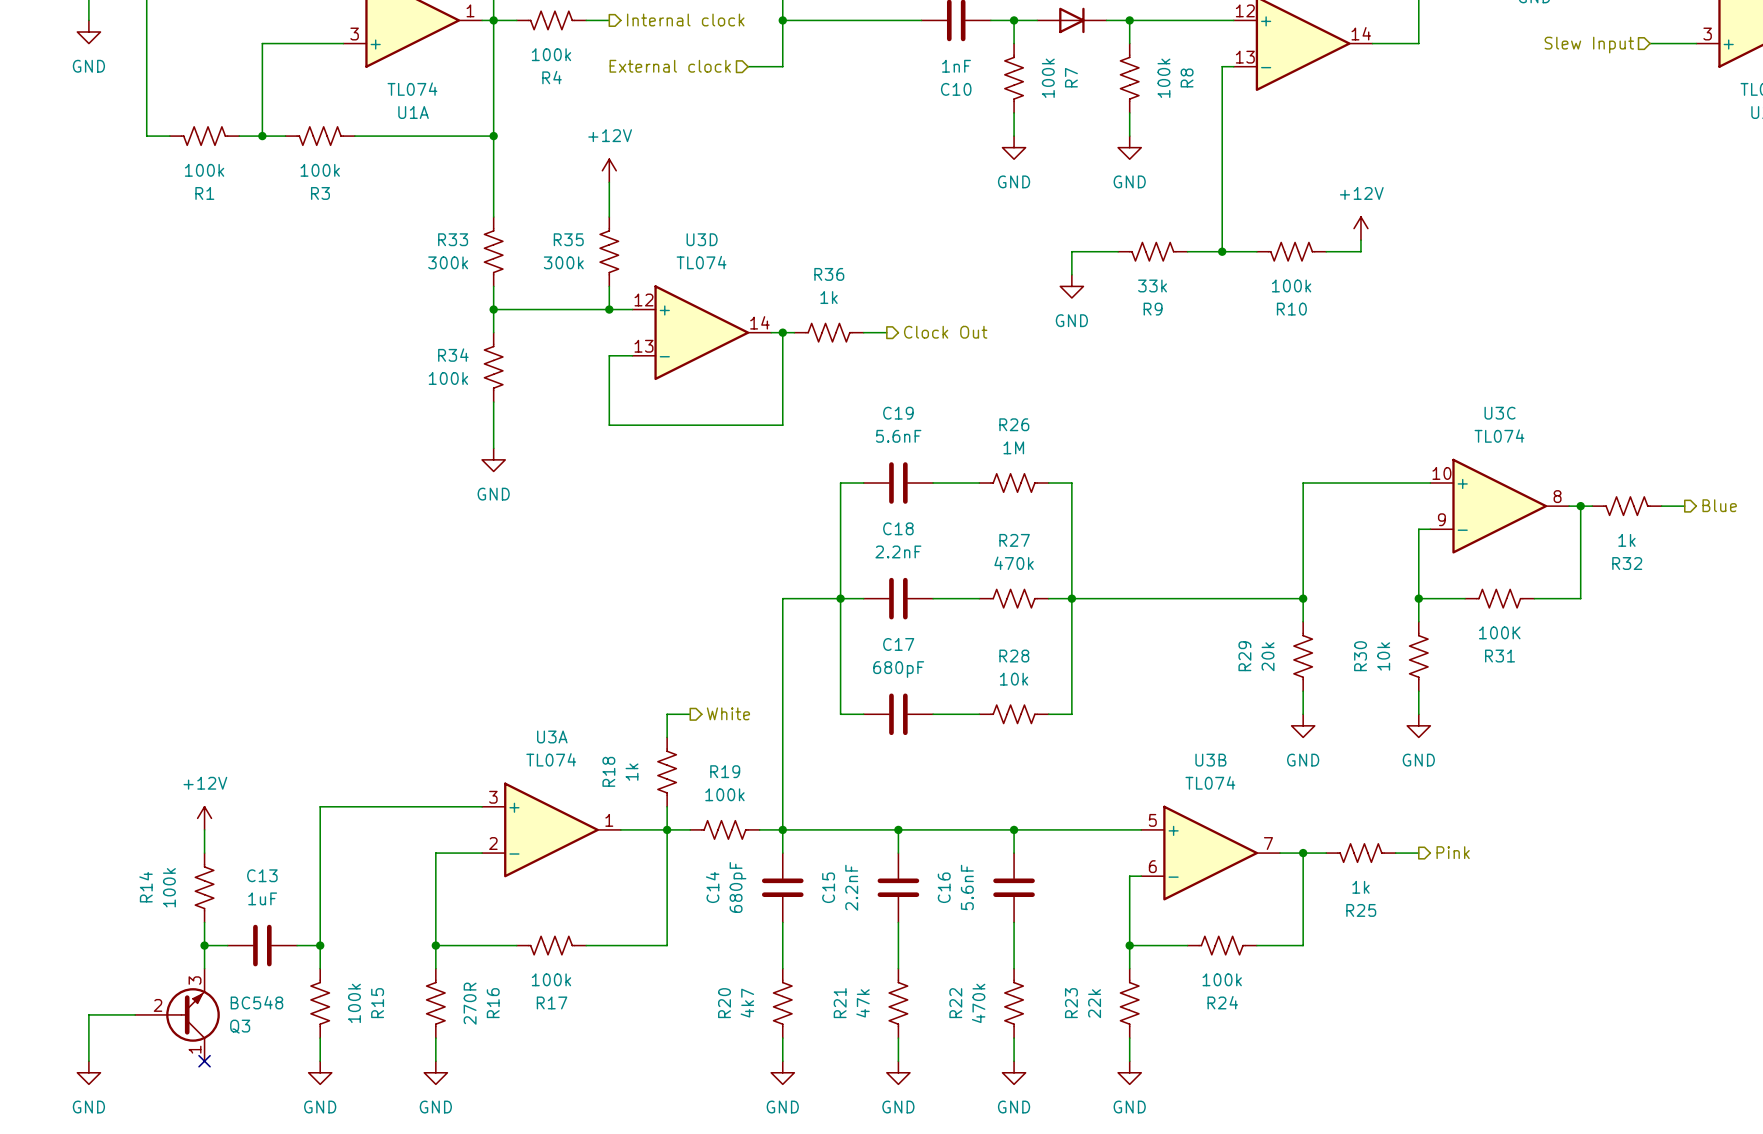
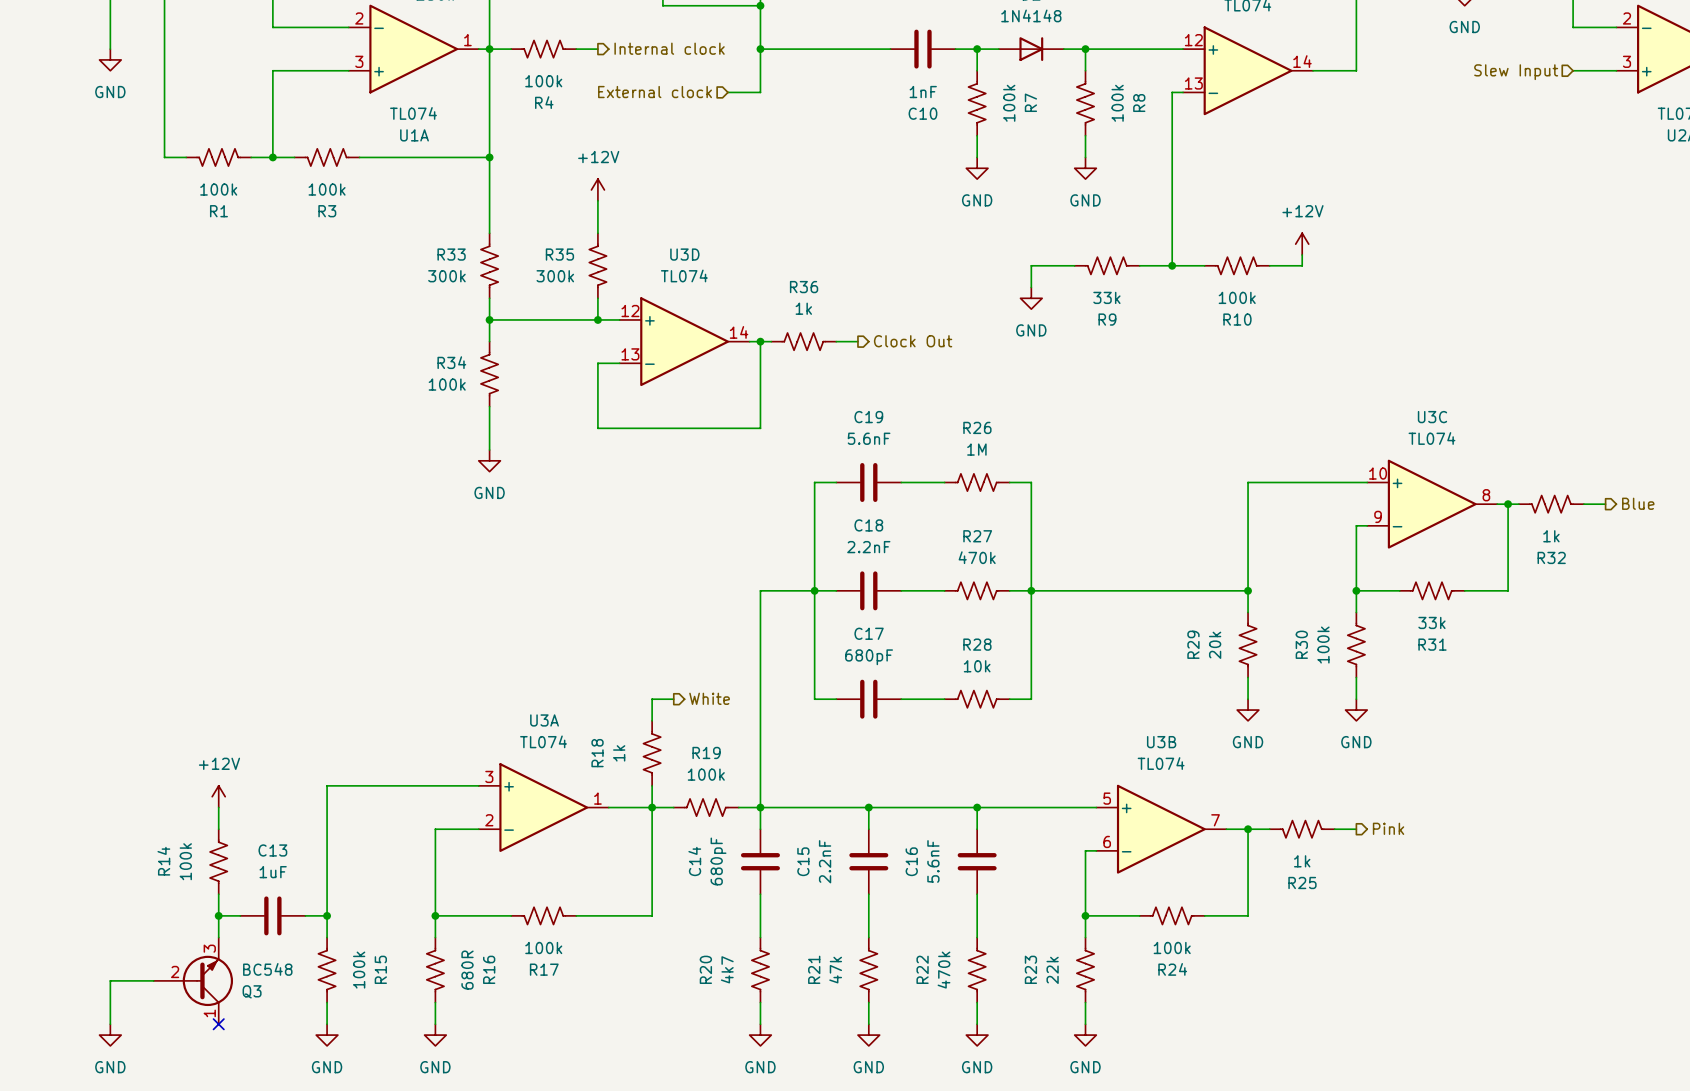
R31 value: 100K (1499, 632) -> 33k (1431, 622)
R30 value: 10k (1383, 656) -> 100k (1323, 645)
R16 value: 270R (470, 1003) -> 680R (467, 970)

